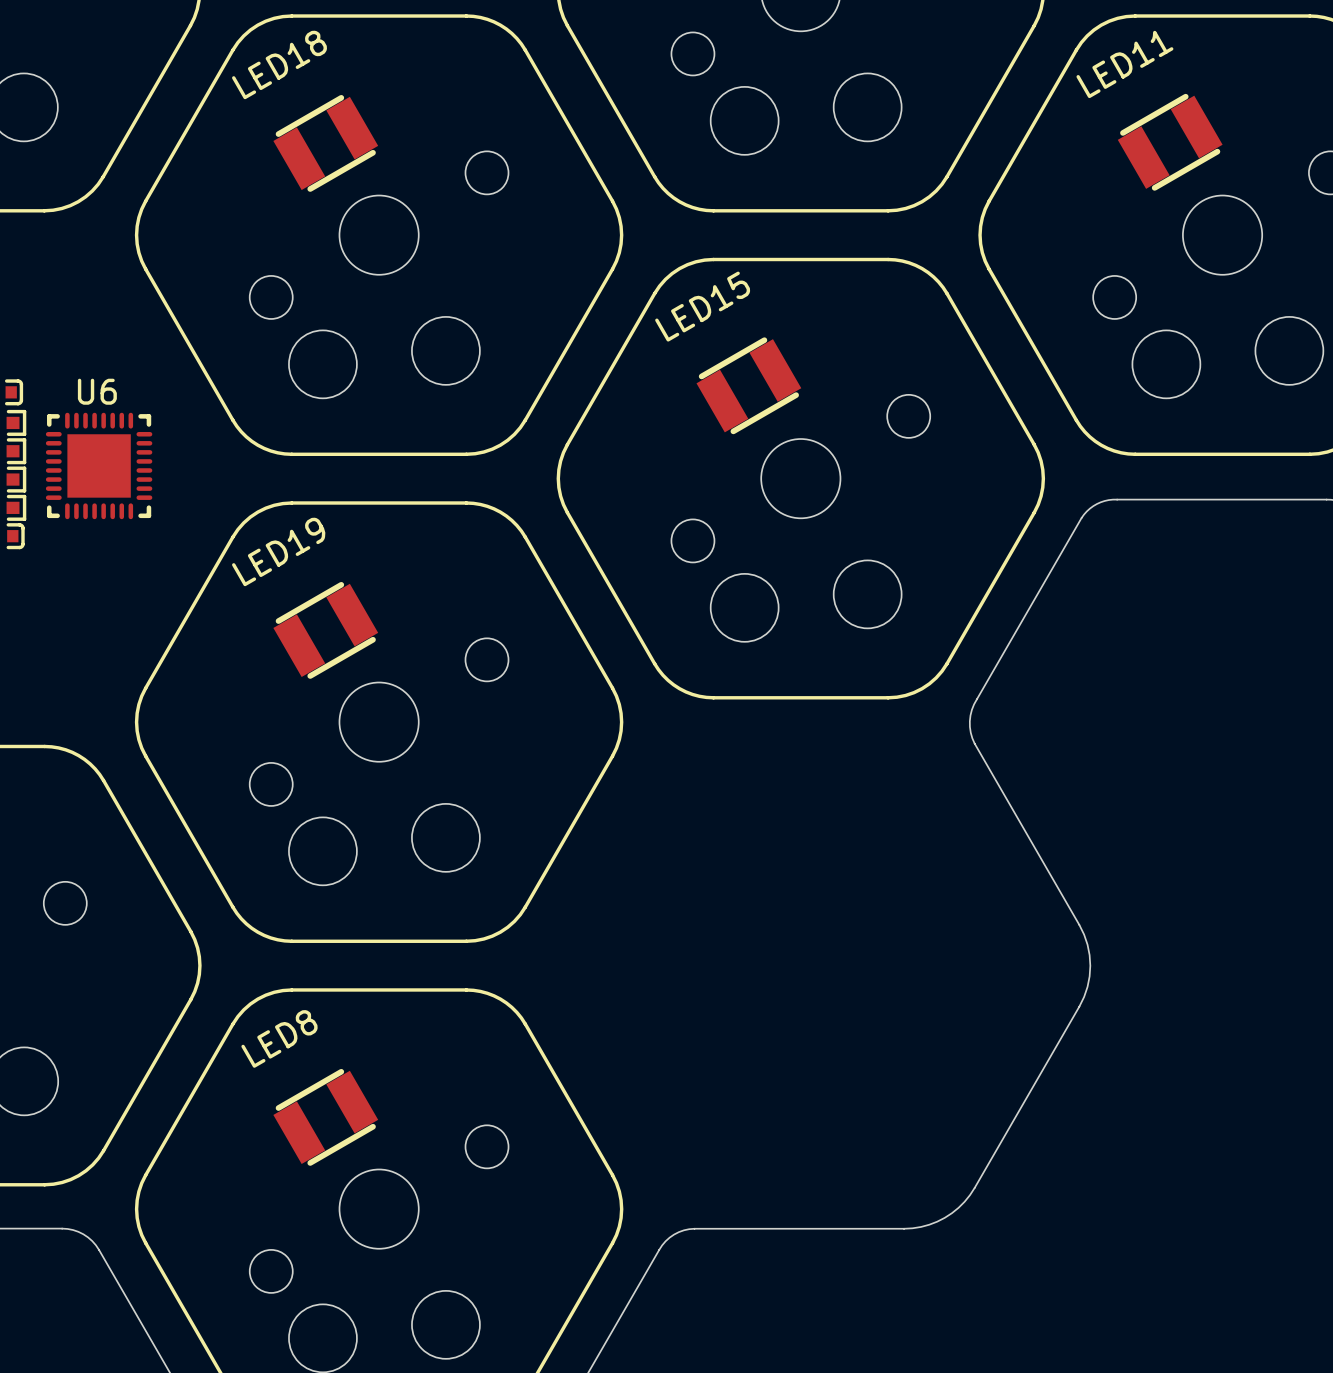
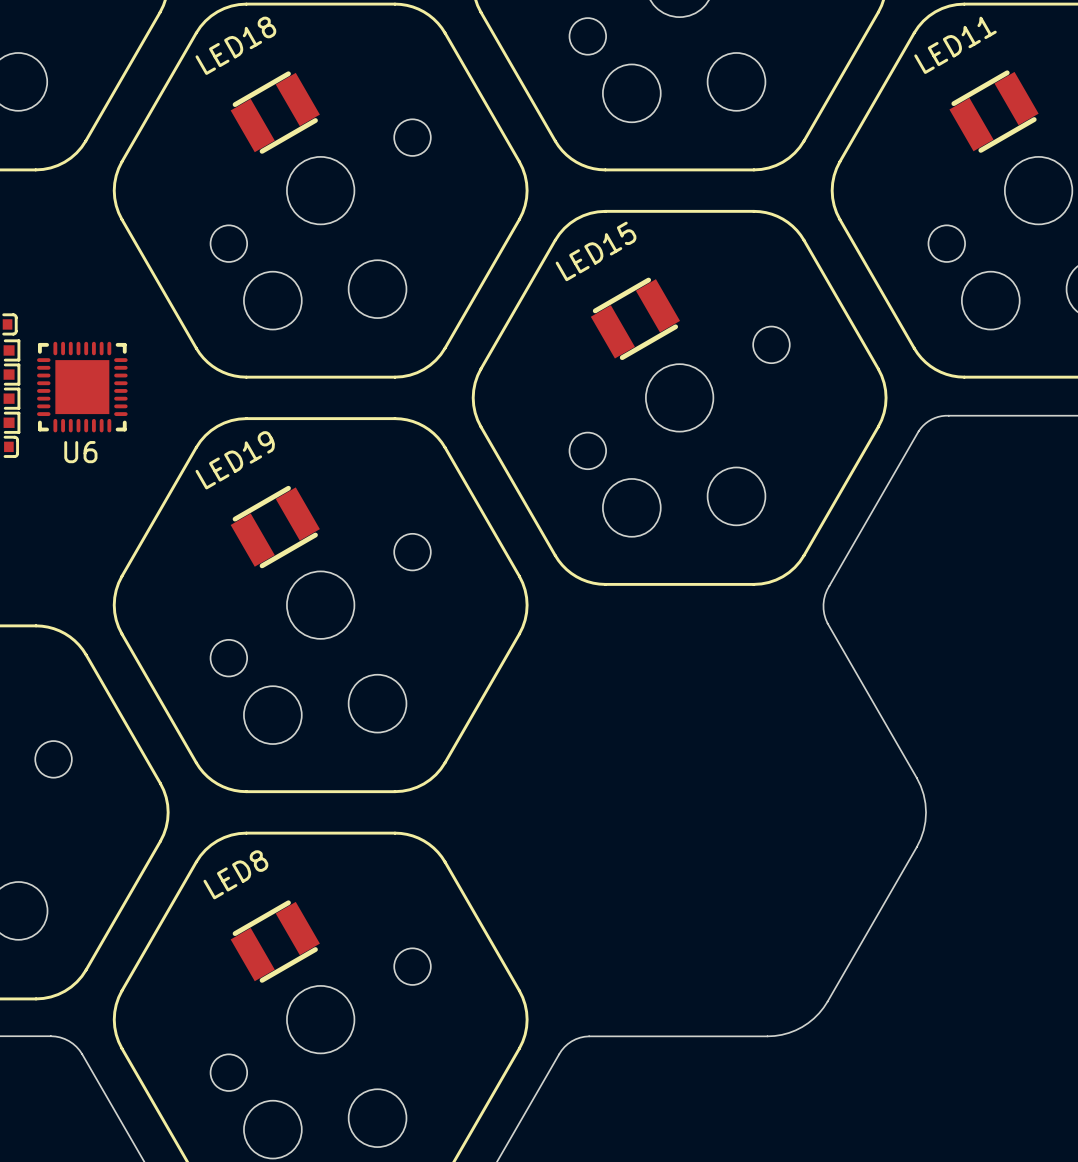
U6 name position: U6 (97, 391) -> U6 (80, 452)

